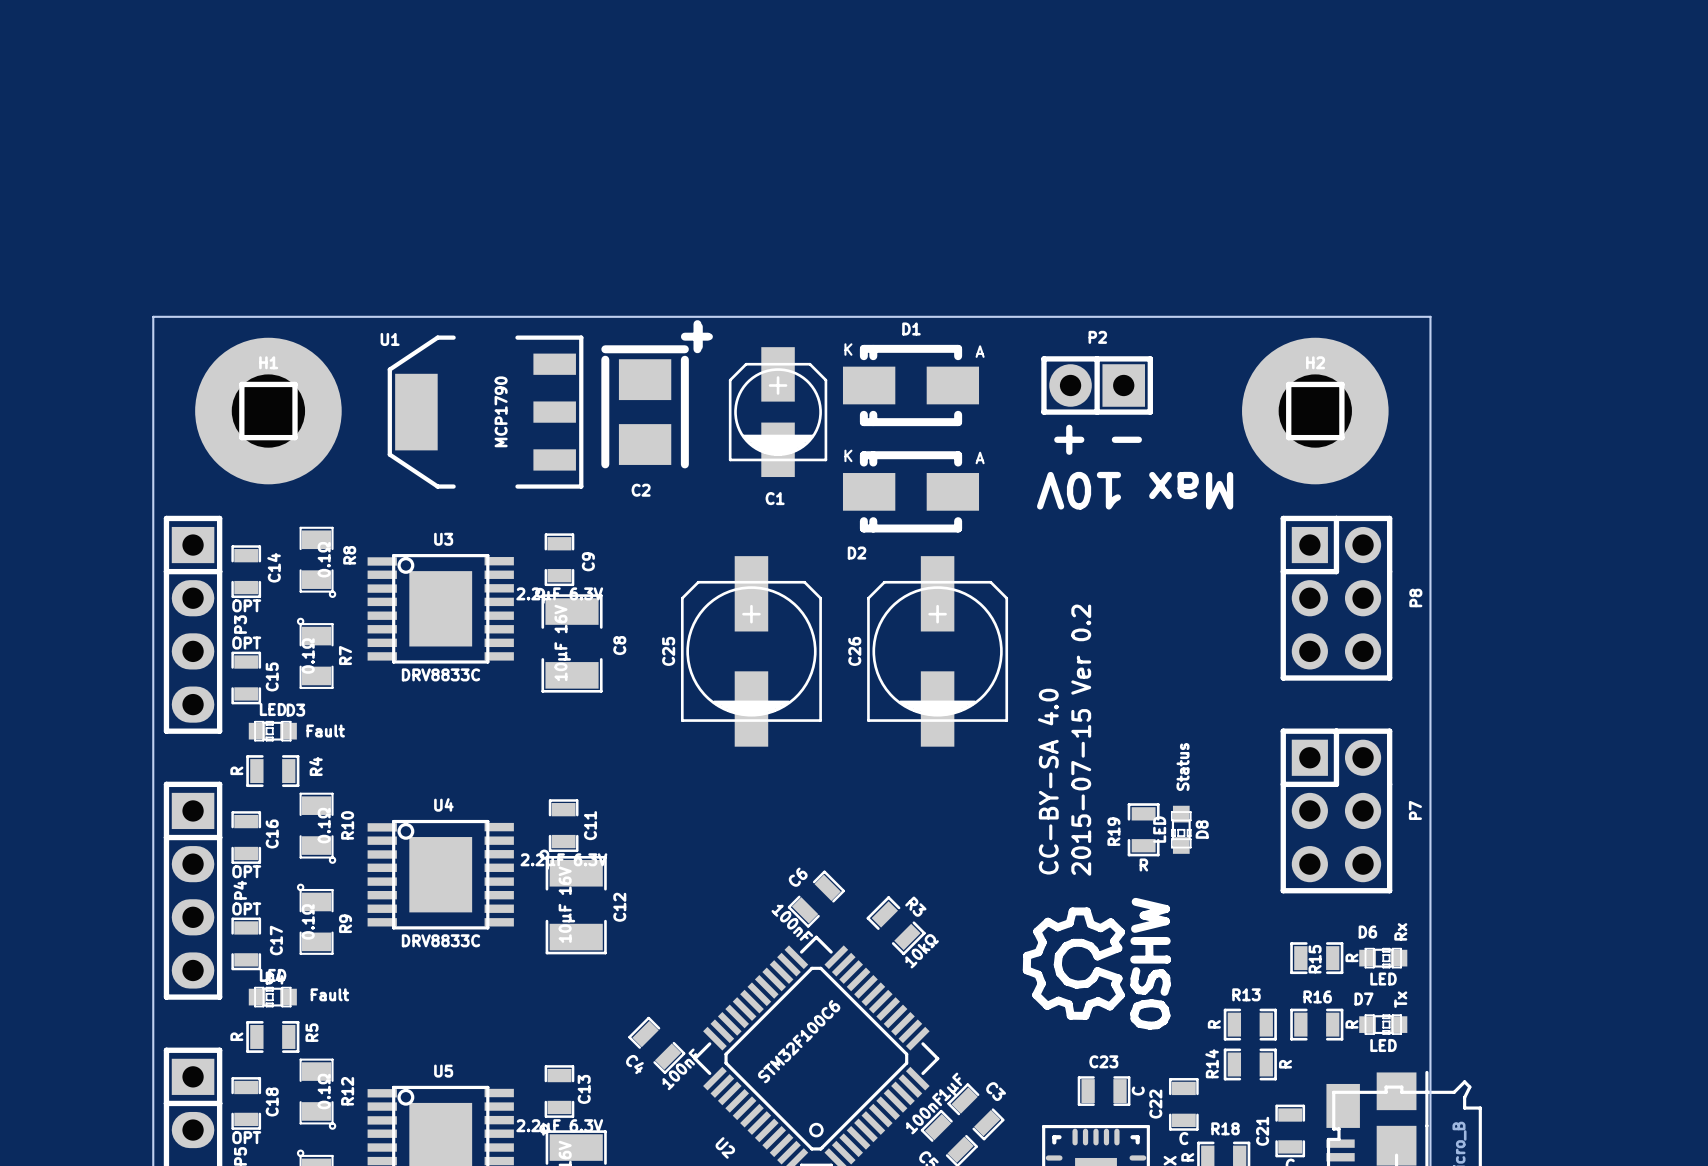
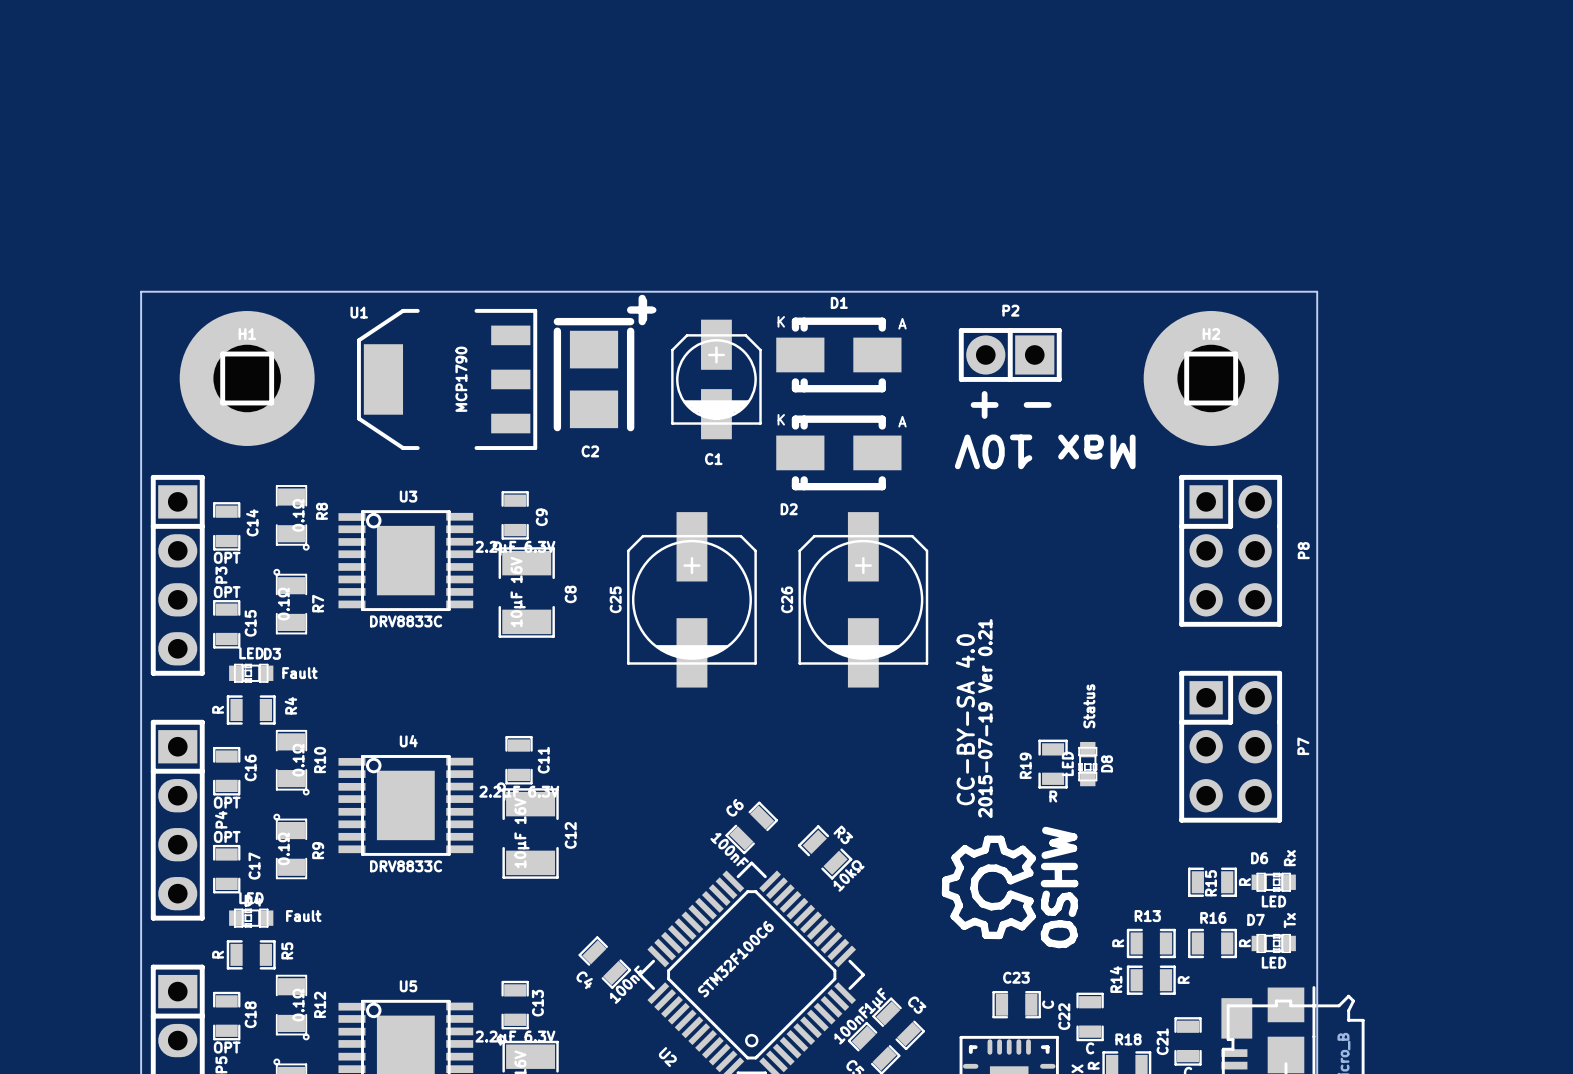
text: 2015-07-15 Ver 0.2 (1081, 740) -> 2015-07-19 Ver 0.21 (985, 718)

